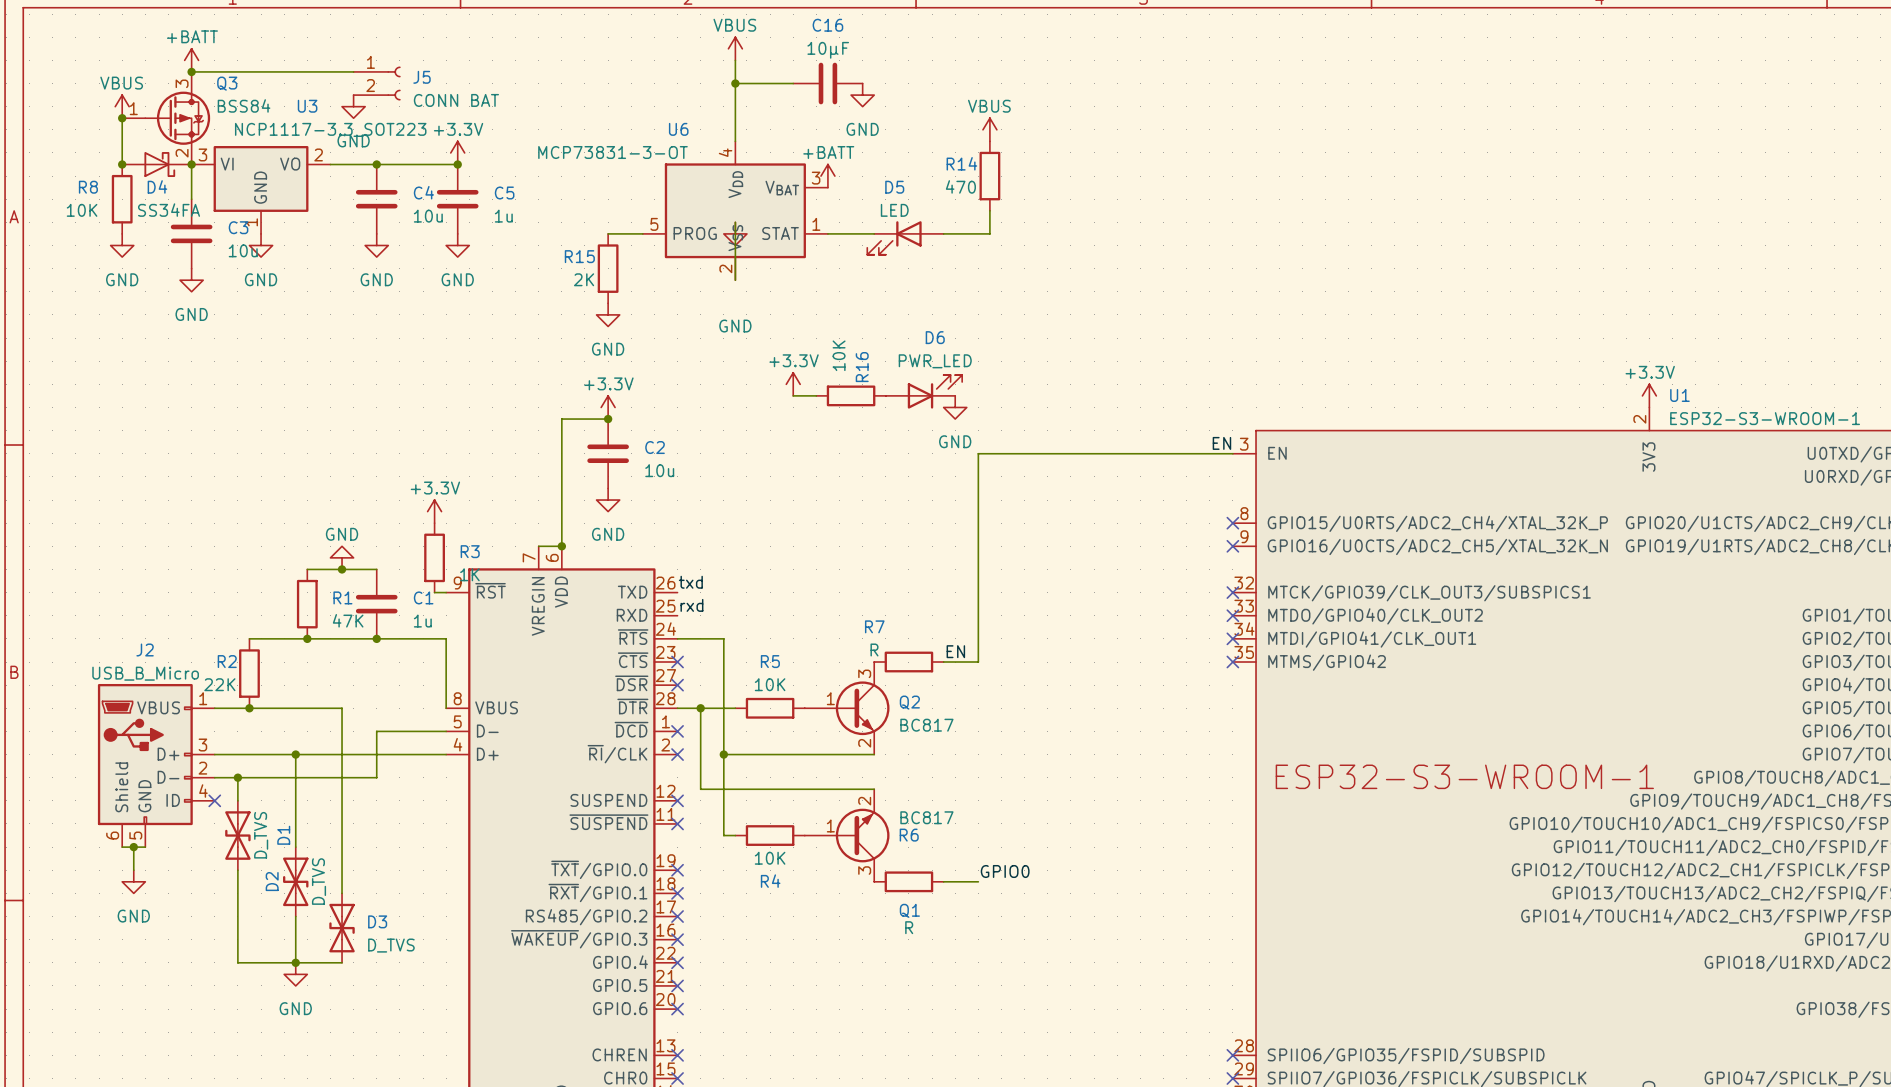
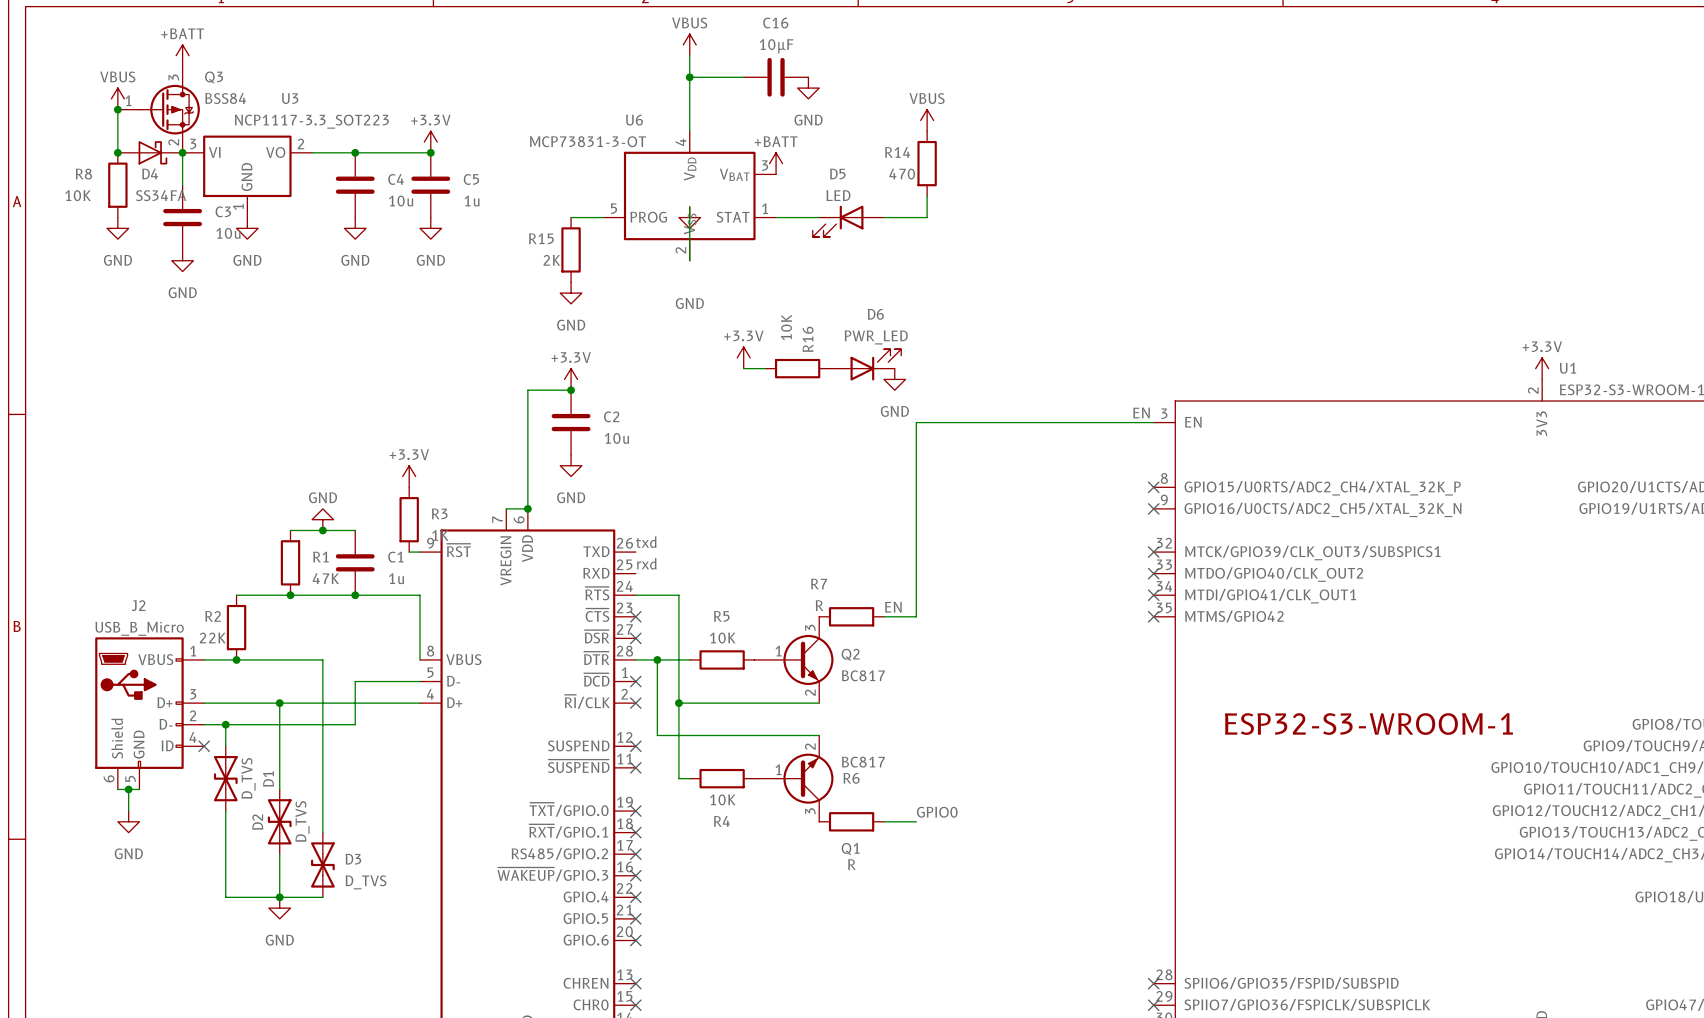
wire: (191, 71) (353, 71) -> none
junction: (191, 71) -> none
J5: CONN BAT (377, 83) -> none
power symbol: GND (353, 106) -> none

